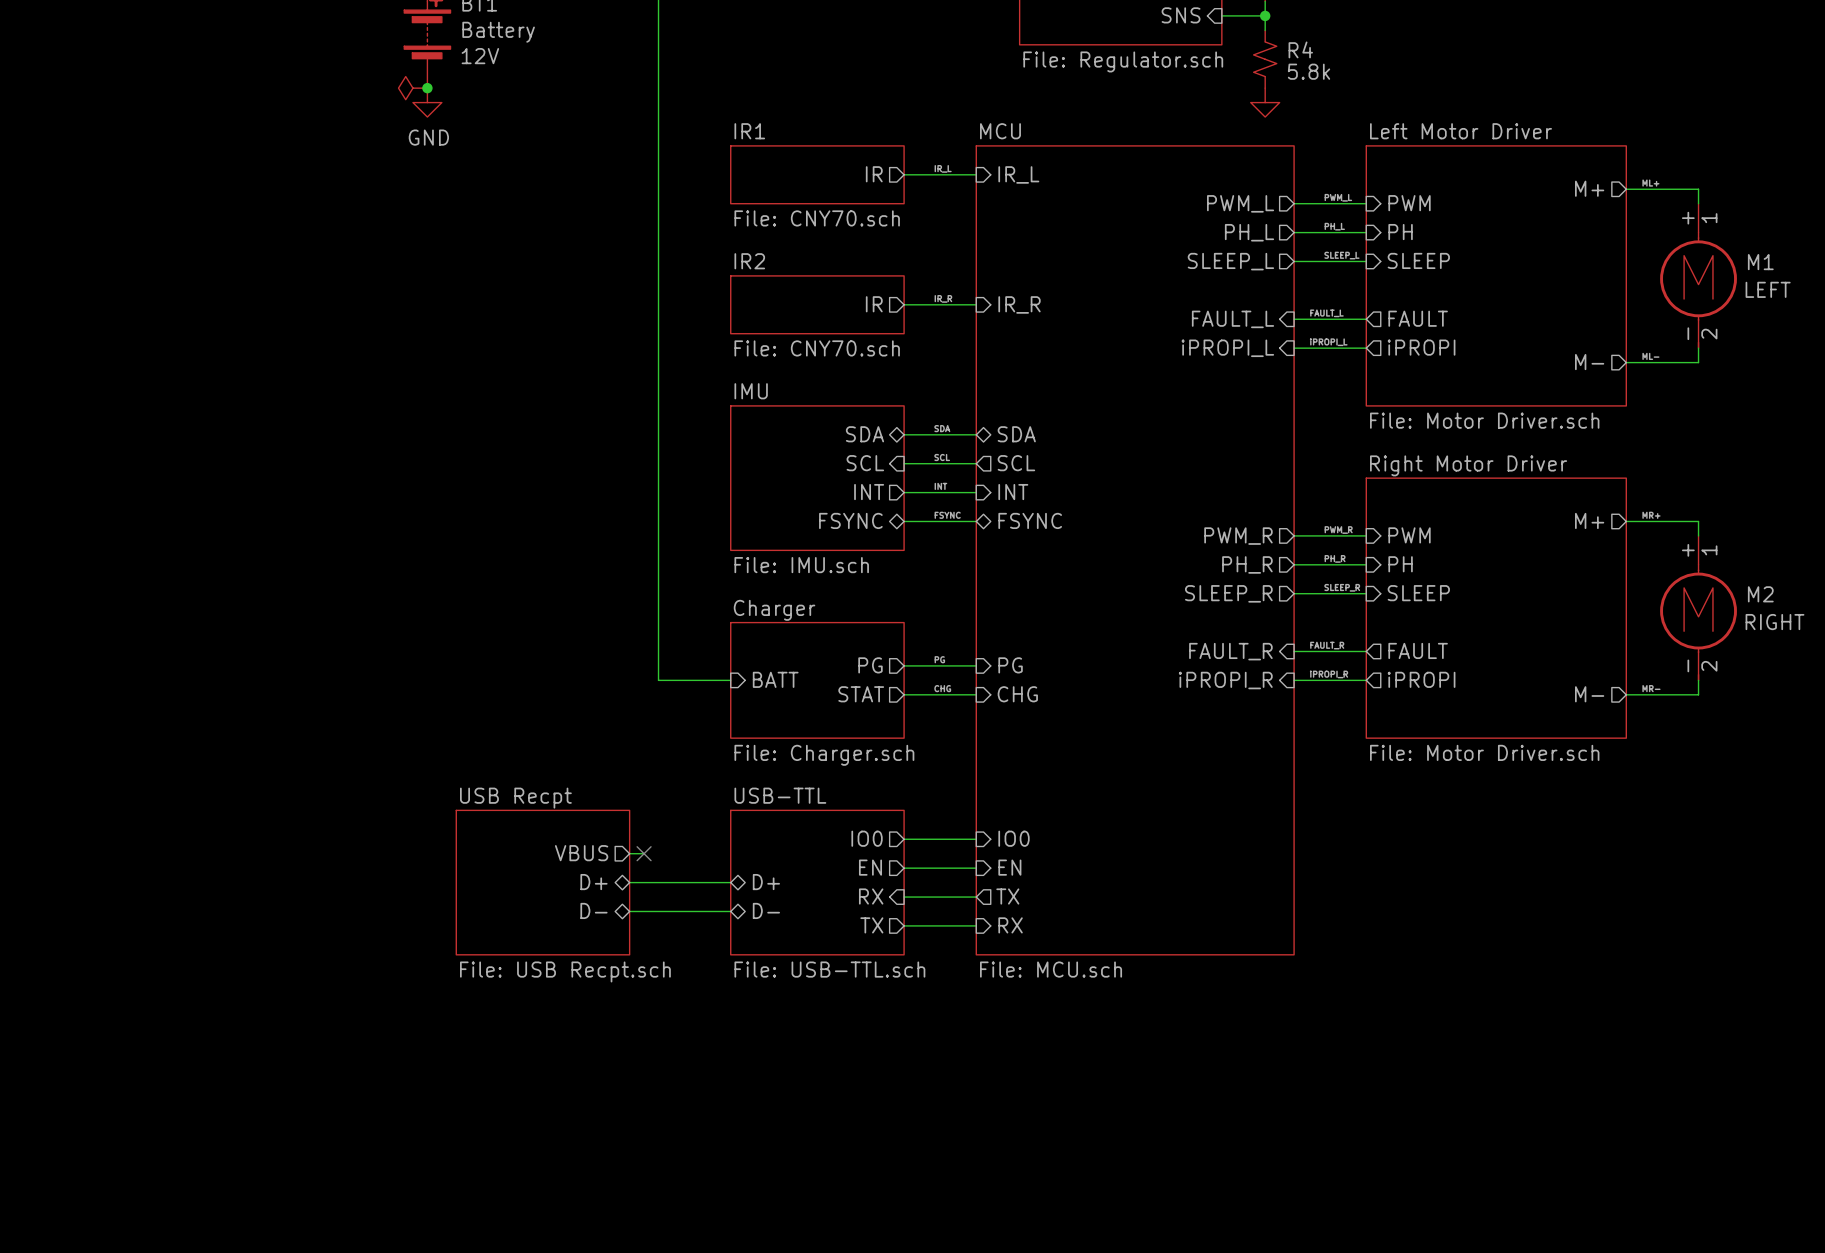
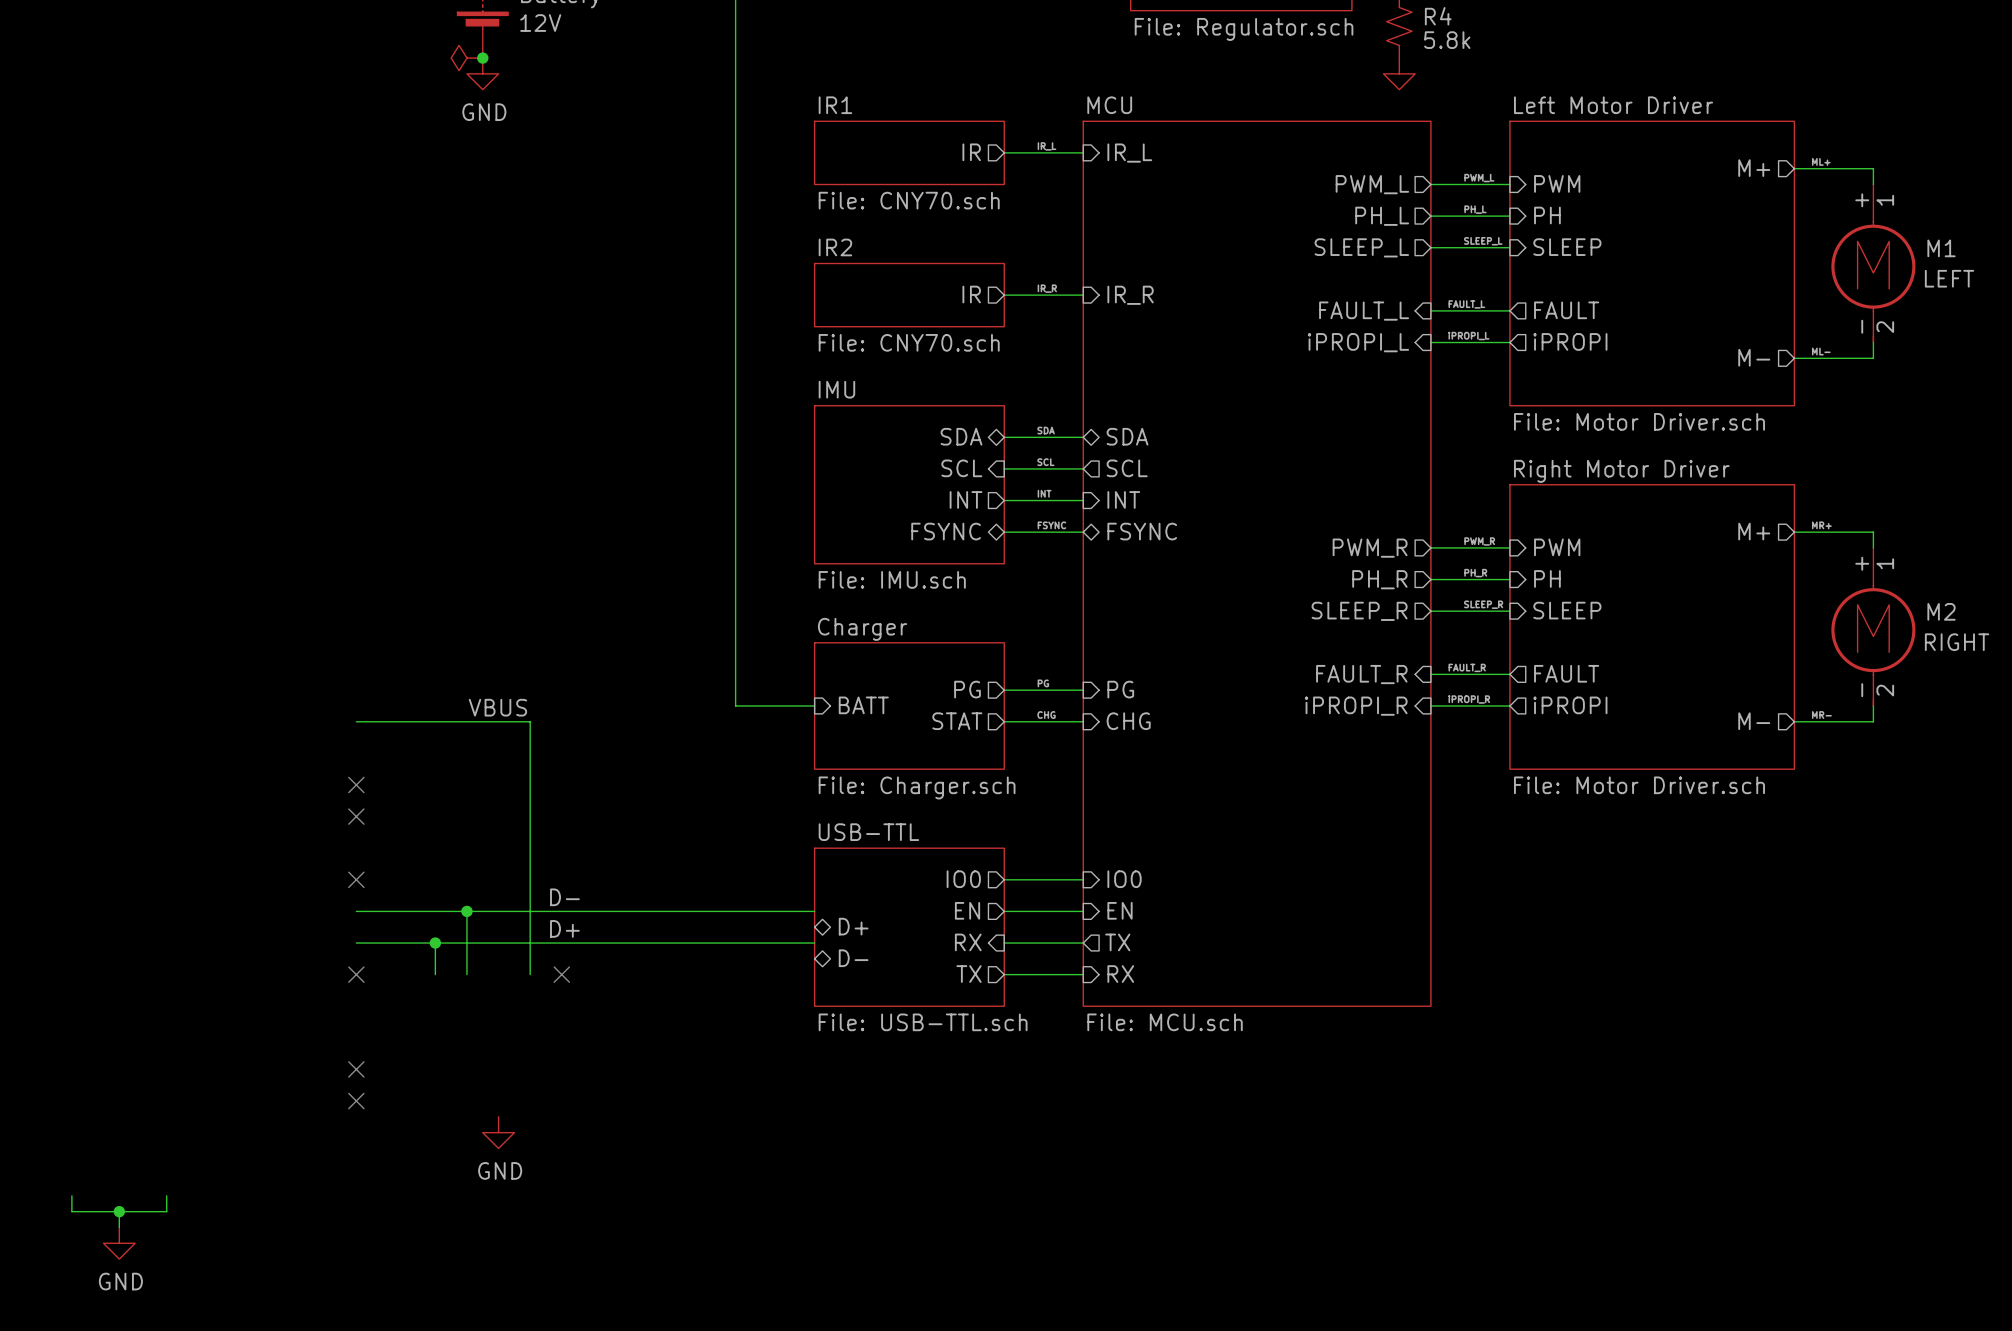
label: none -> VBUS (497, 707)
wire: none -> (356, 721) (530, 721) (530, 974)
no-connect mark: none -> (356, 784)
no-connect mark: none -> (356, 816)
no-connect mark: none -> (356, 879)
sheet pin: VBUS (581, 853) -> none
wire: (629, 853) (644, 853) -> none
no-connect mark: (644, 853) -> none
label: none -> D- (564, 897)
wire: none -> (356, 911) (814, 911)
wire: none -> (466, 911) (466, 974)
junction: none -> (466, 911)
sheet USB Recpt: File: USB Recpt.sch (542, 882) -> none
sheet pin: D+ (593, 882) -> none
wire: (629, 882) (730, 882) -> none
label: none -> D+ (564, 928)
wire: none -> (356, 943) (814, 943)
wire: none -> (435, 943) (435, 974)
junction: none -> (435, 943)
sheet pin: D- (593, 910) -> none
wire: (629, 911) (730, 911) -> none
no-connect mark: none -> (356, 974)
no-connect mark: none -> (561, 974)
no-connect mark: none -> (356, 1069)
no-connect mark: none -> (356, 1101)
power symbol: none -> GND (498, 1132)
wire: none -> (71, 1195) (71, 1211) (166, 1211) (166, 1195)
wire: none -> (119, 1211) (119, 1227)
junction: none -> (119, 1211)
power symbol: none -> GND (119, 1243)

